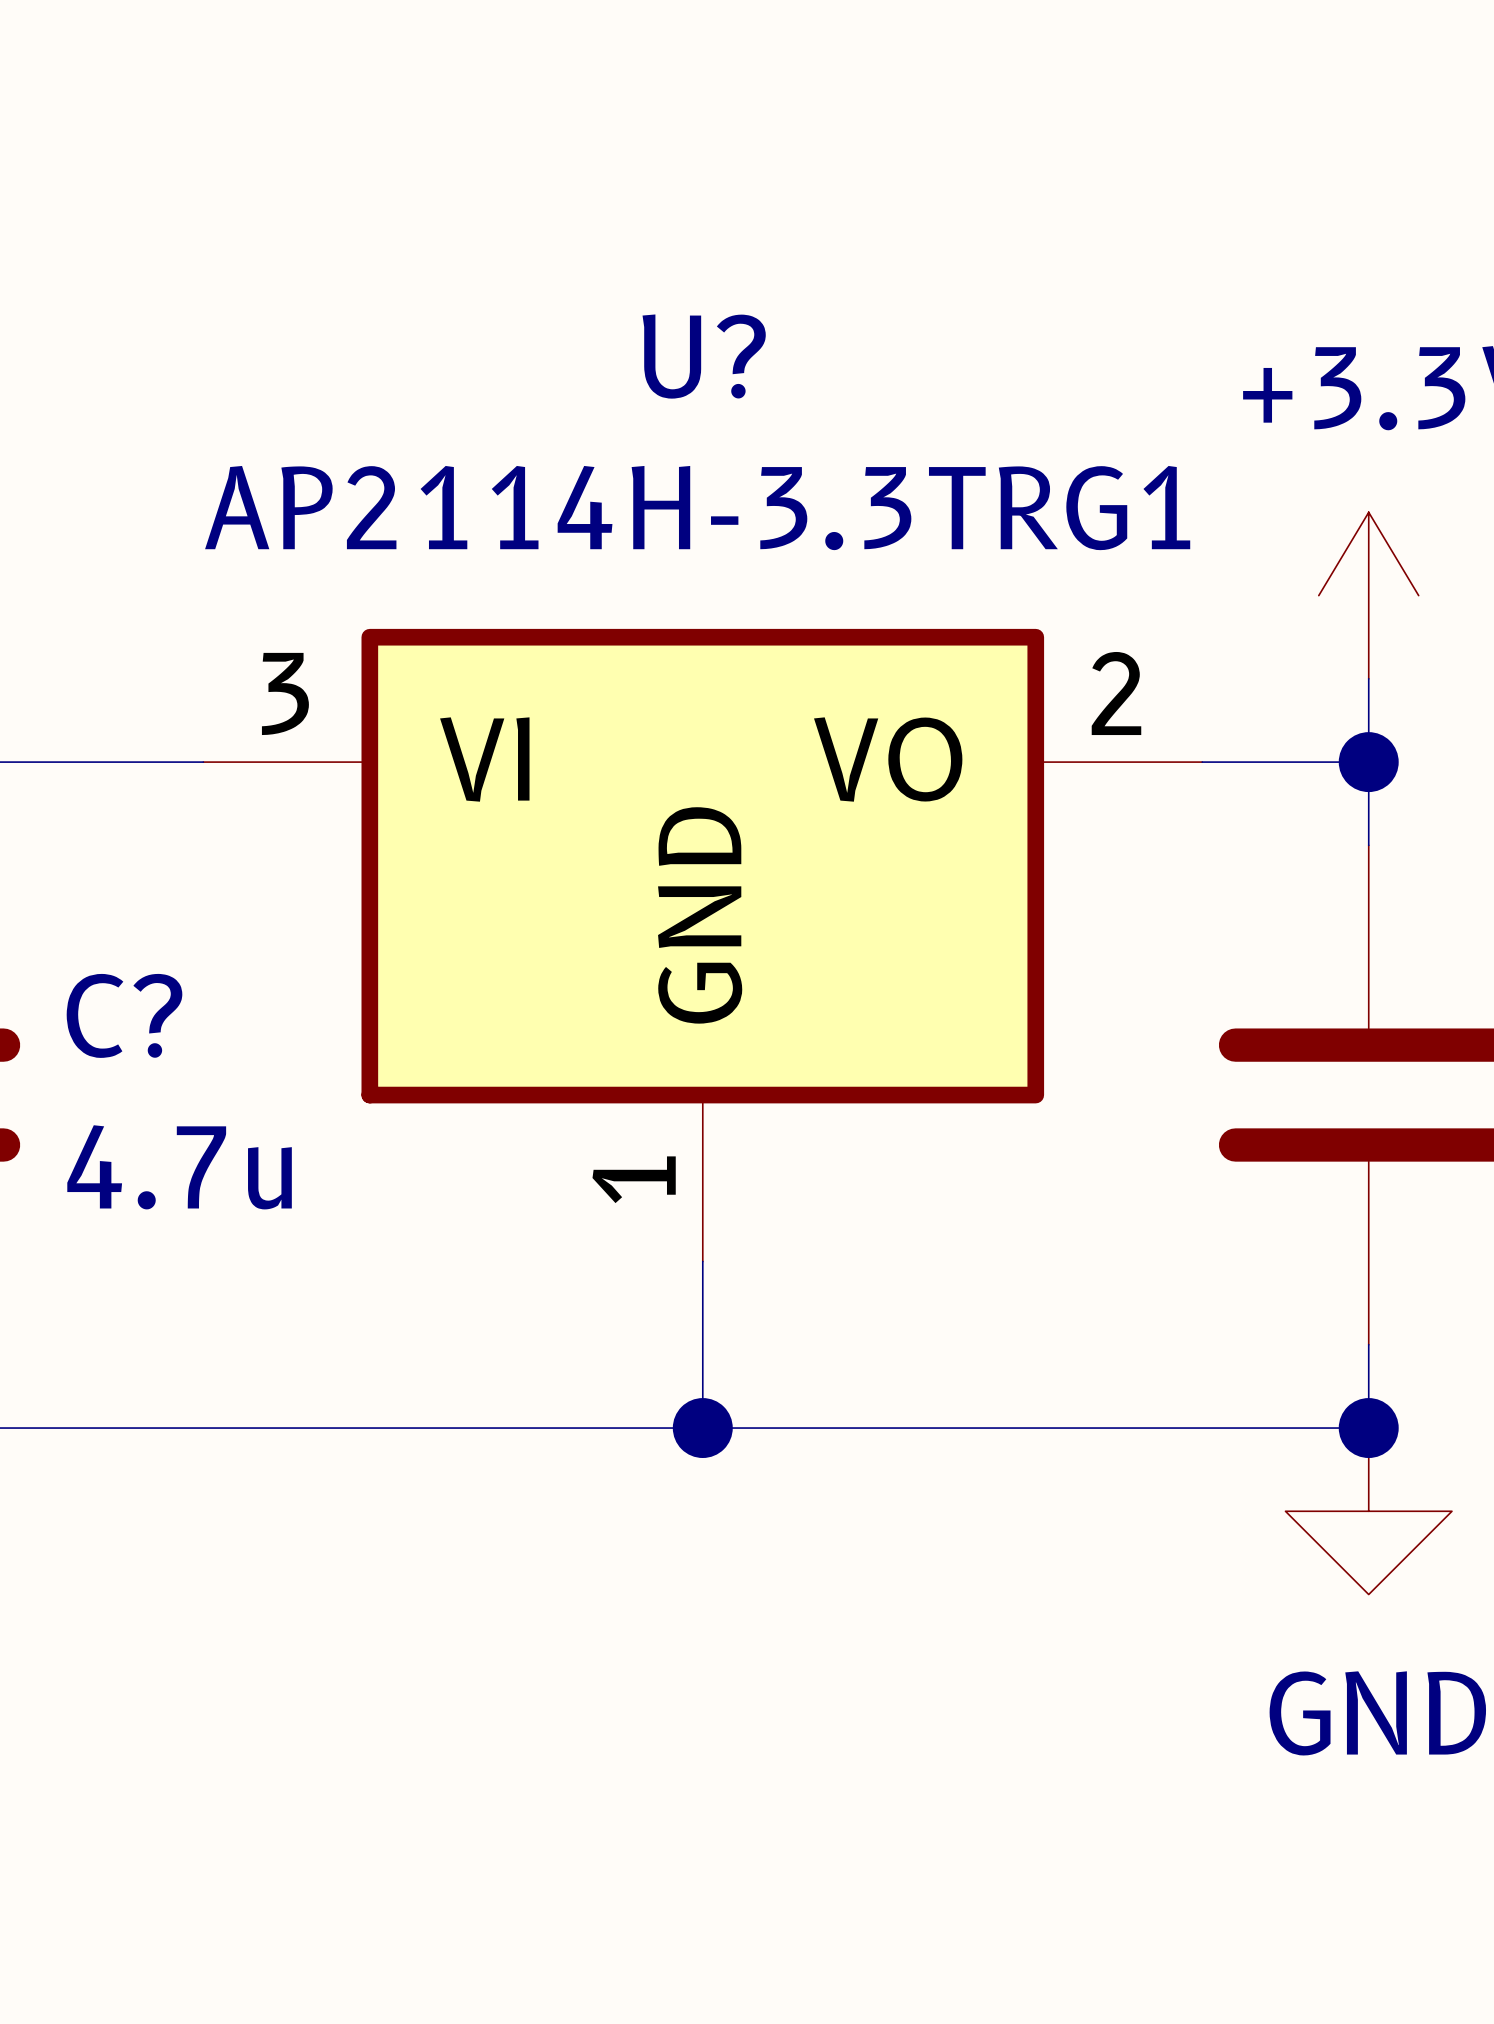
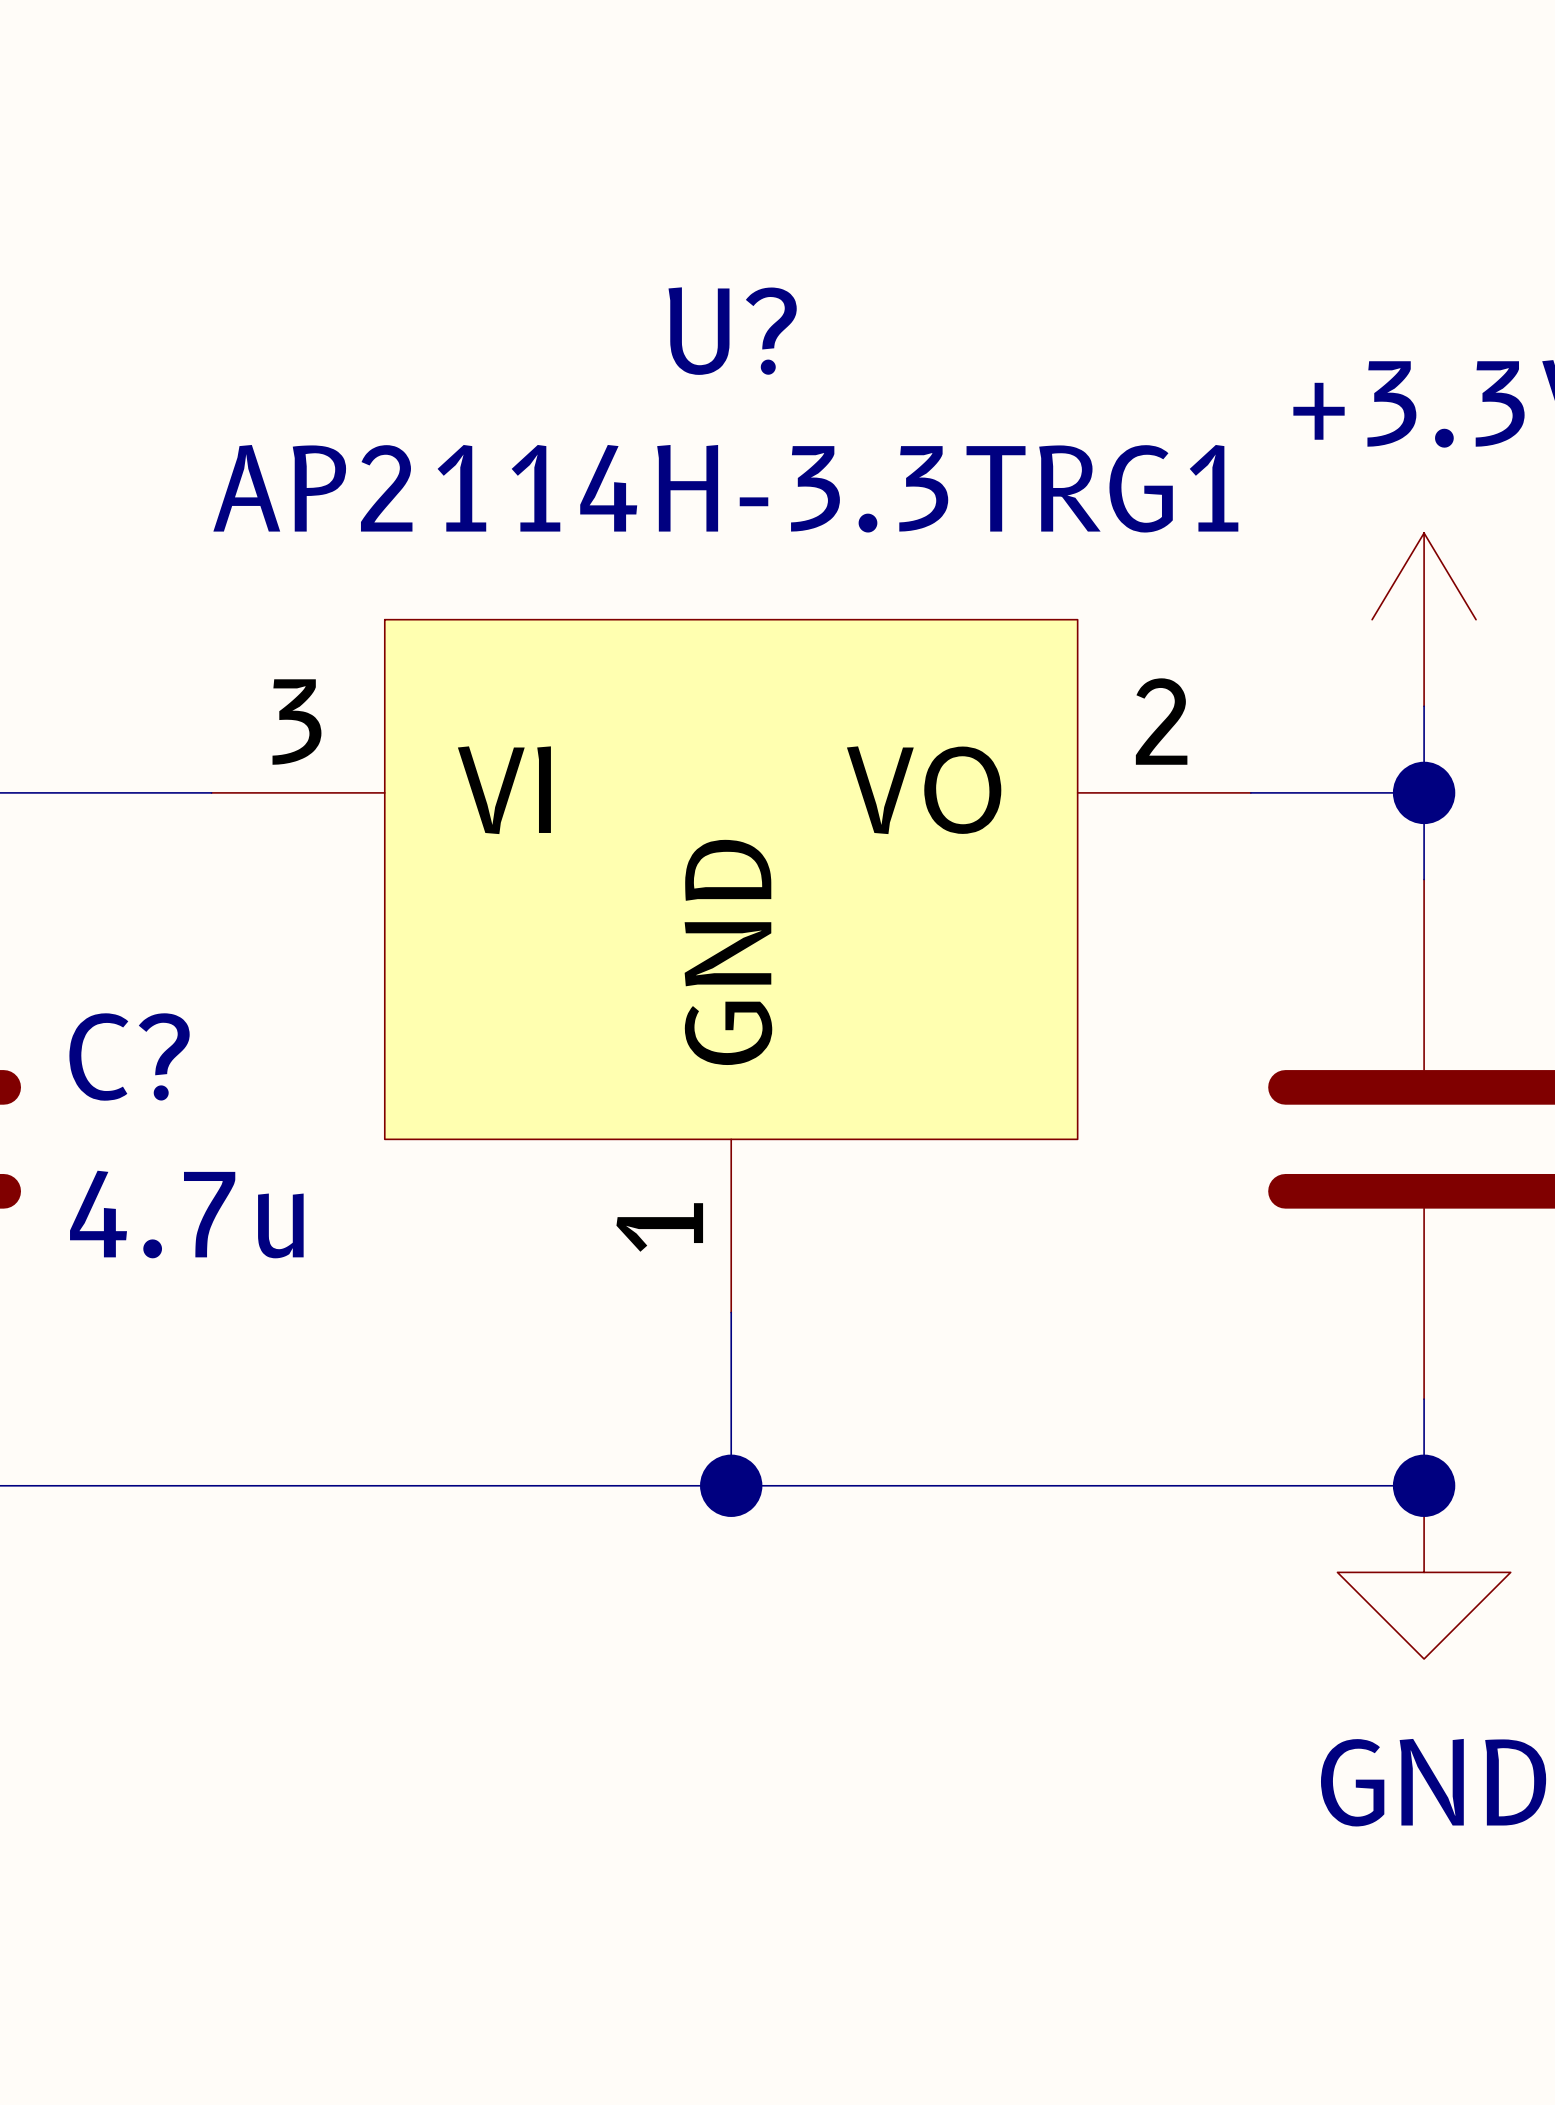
U? name position: U? (704, 356) -> U? (732, 331)
U? value position: AP2114H-3.3TRG1 (697, 508) -> AP2114H-3.3TRG1 (725, 488)
U? symbol: [203, 628, 1203, 1262] -> [211, 619, 1251, 1313]

